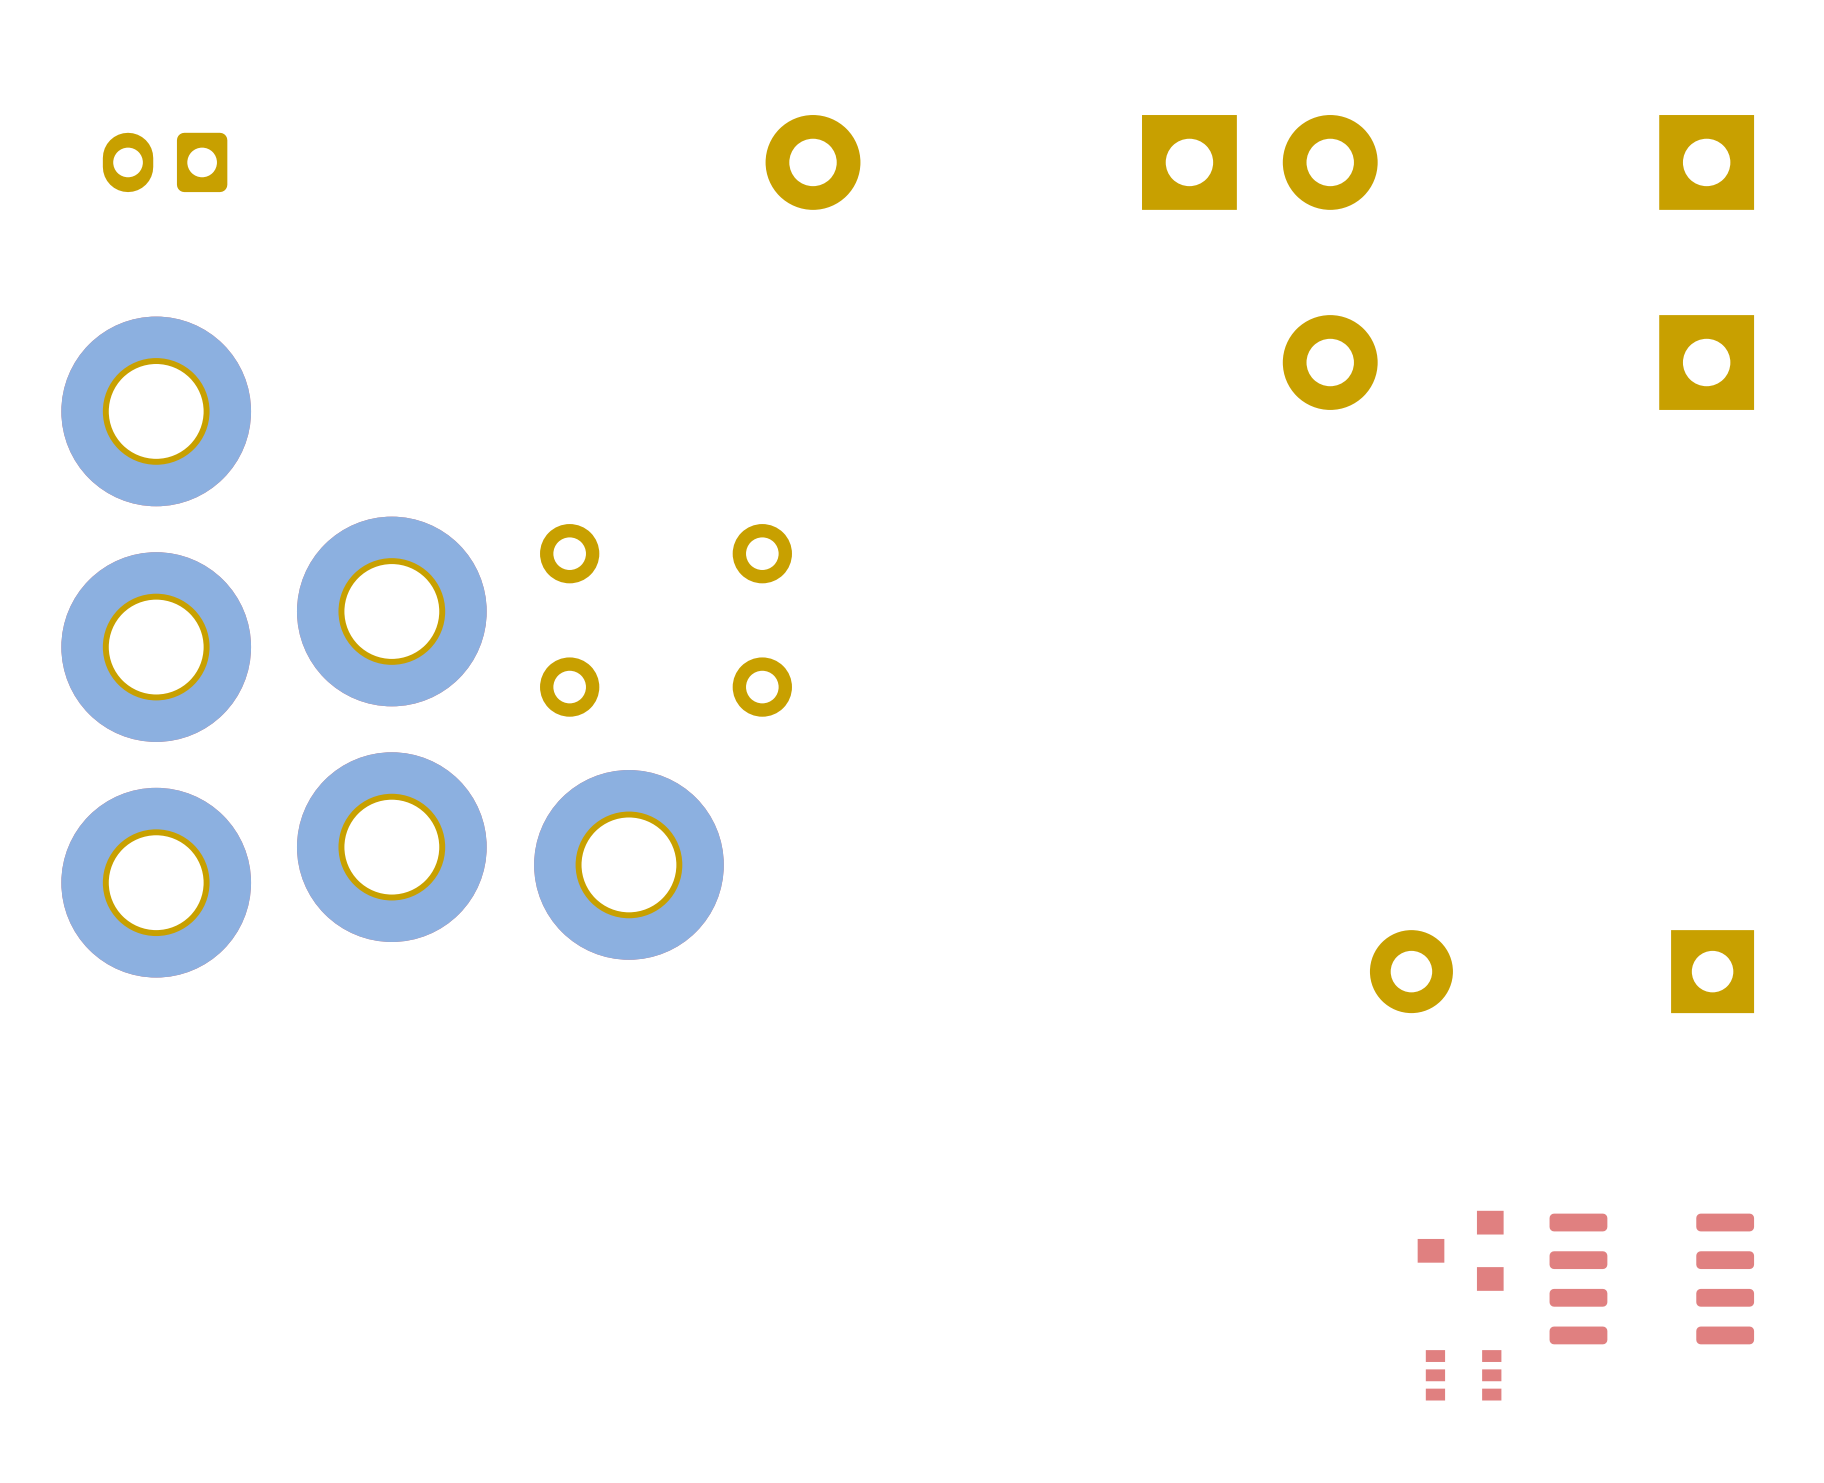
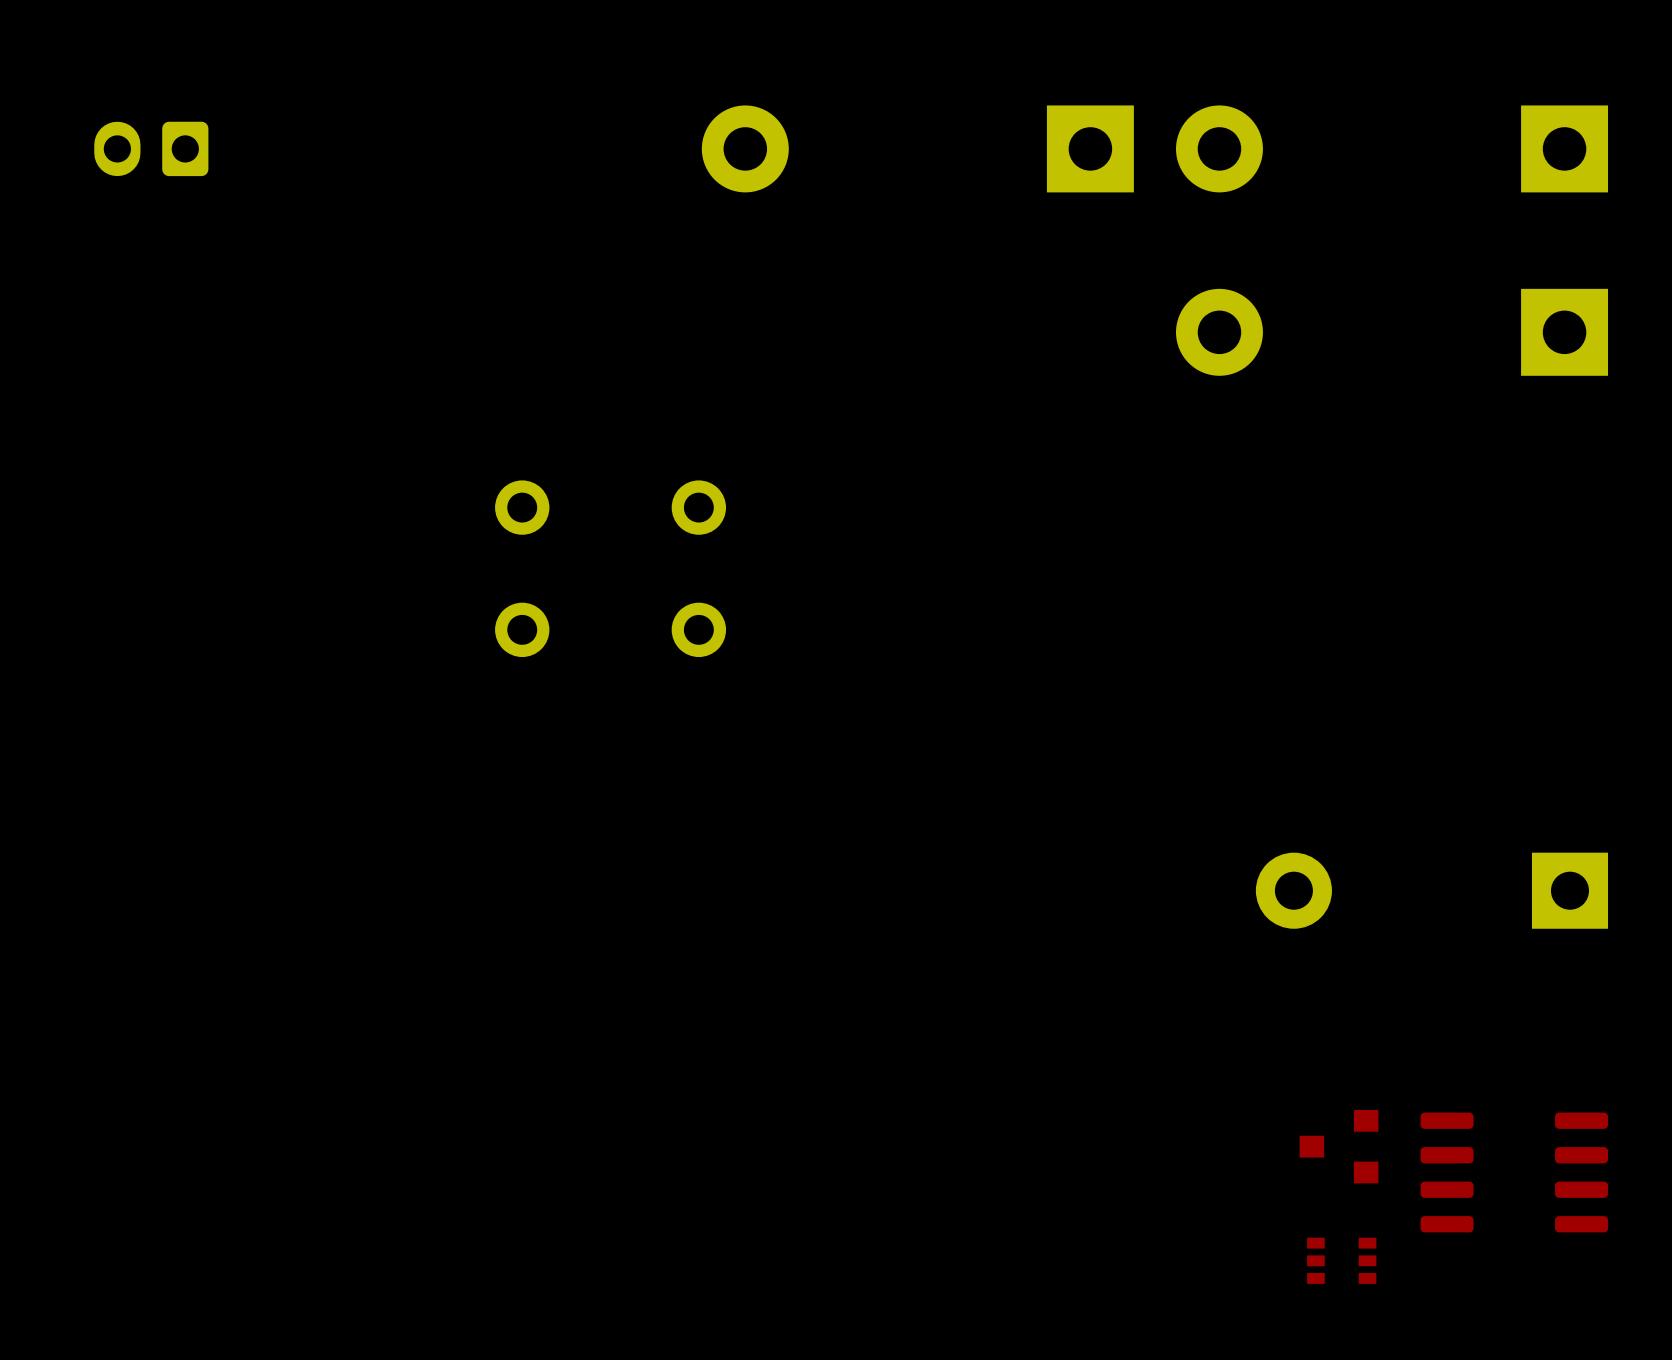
part: (156, 411) -> none
part: (391, 611) -> none
part: (156, 647) -> none
part: (391, 847) -> none
part: (628, 864) -> none
part: (156, 882) -> none

